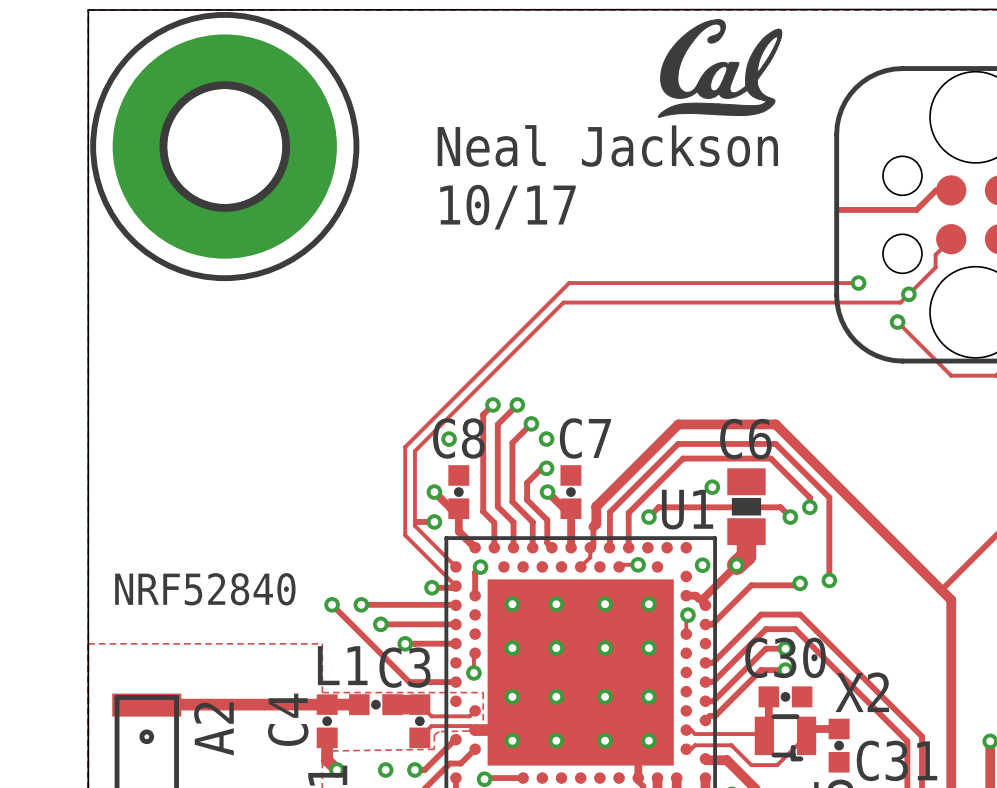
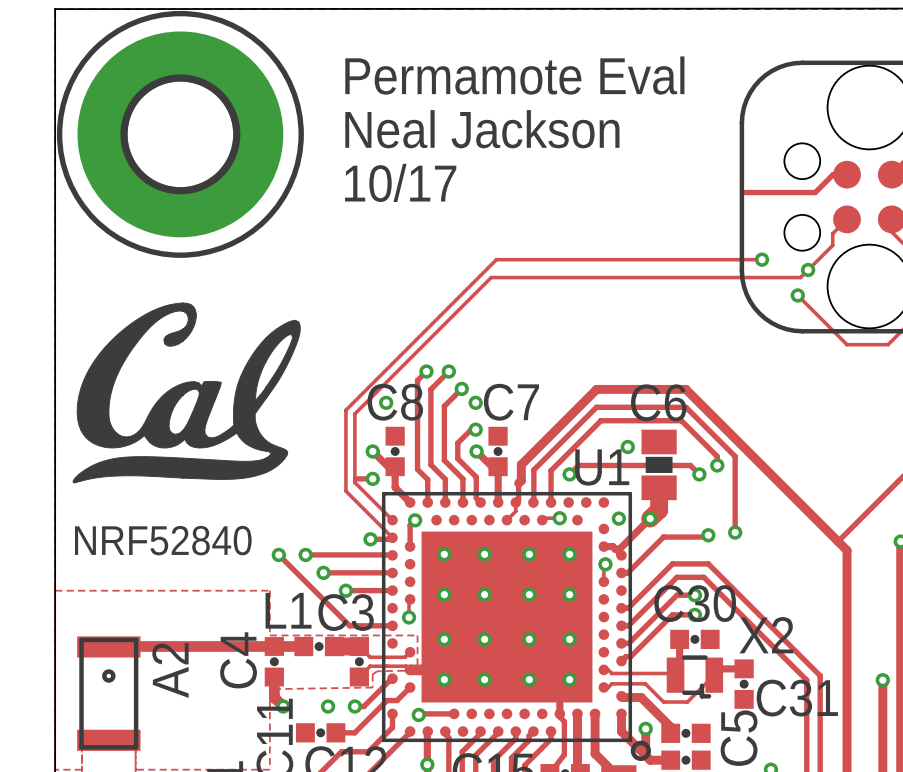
drawing: [657, 19, 783, 118] -> none
text: none -> Permamote Eval (514, 75)
text position: Neal Jackson (607, 145) -> Neal Jackson (482, 129)
text position: 10/17 (507, 207) -> 10/17 (400, 182)
drawing: none -> [72, 302, 301, 484]

